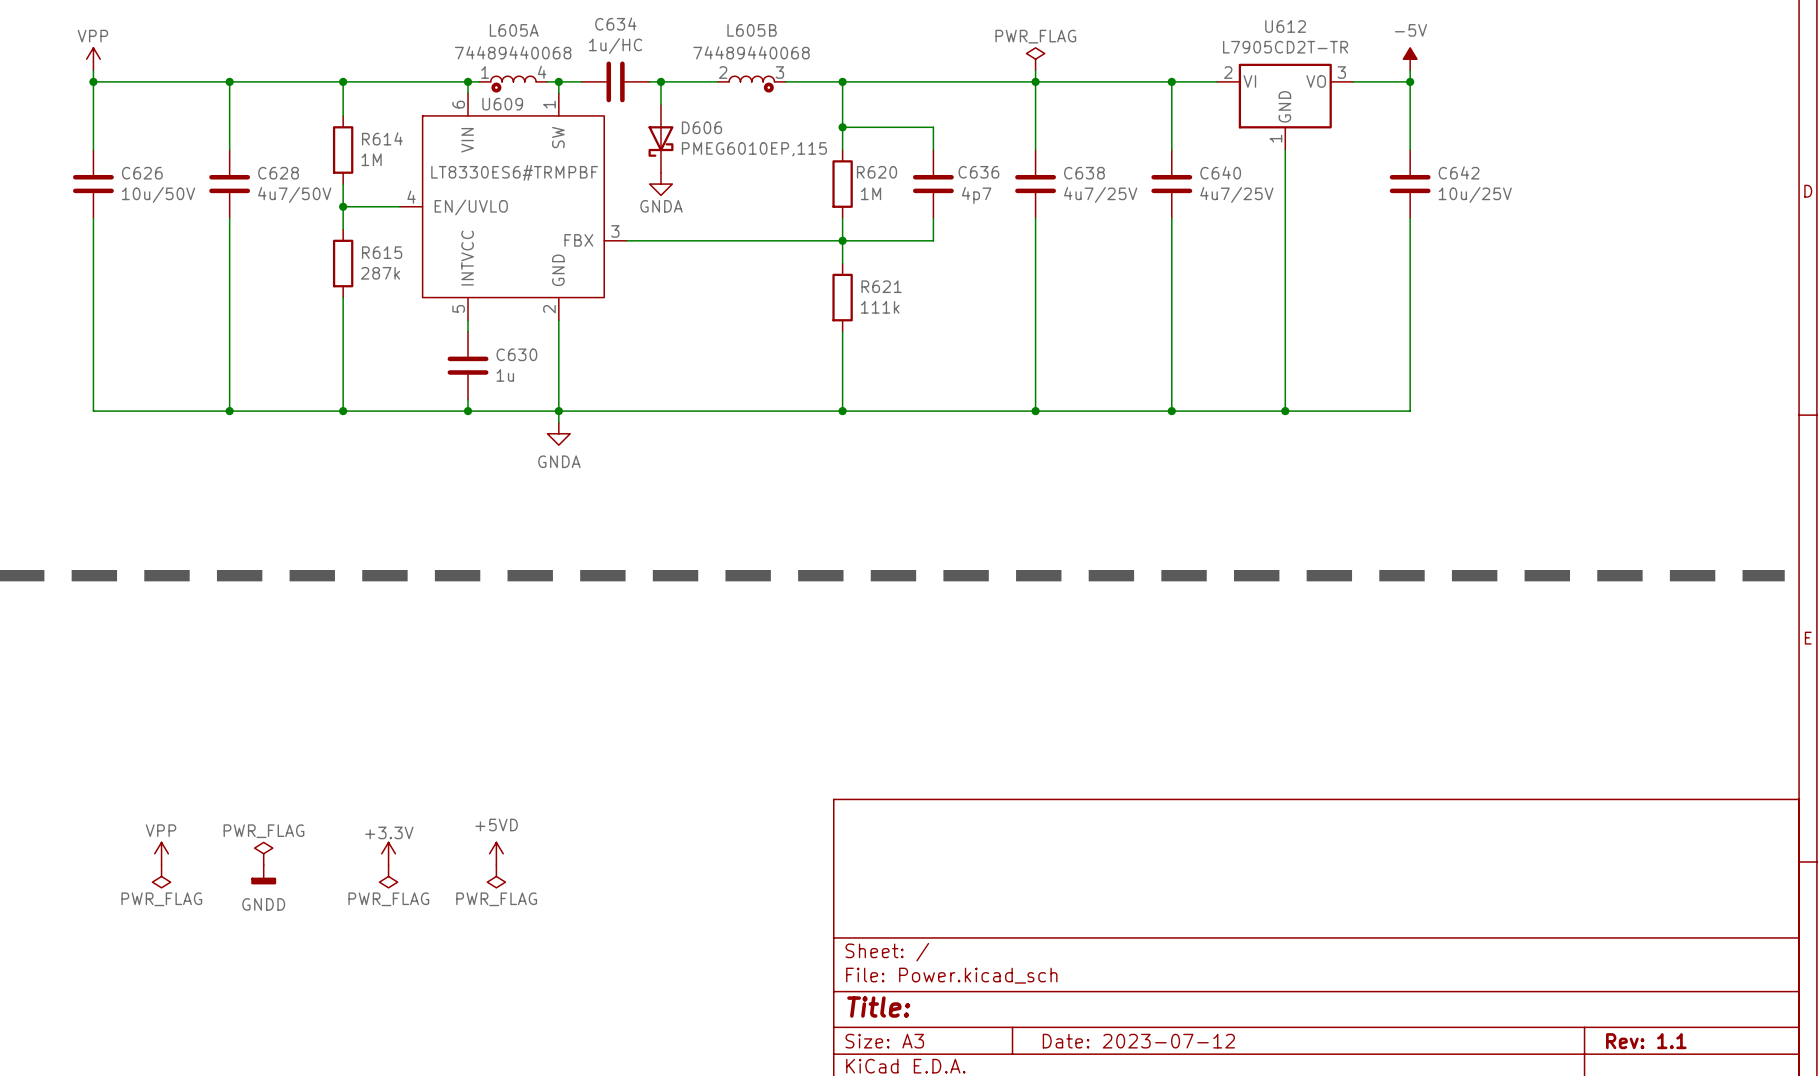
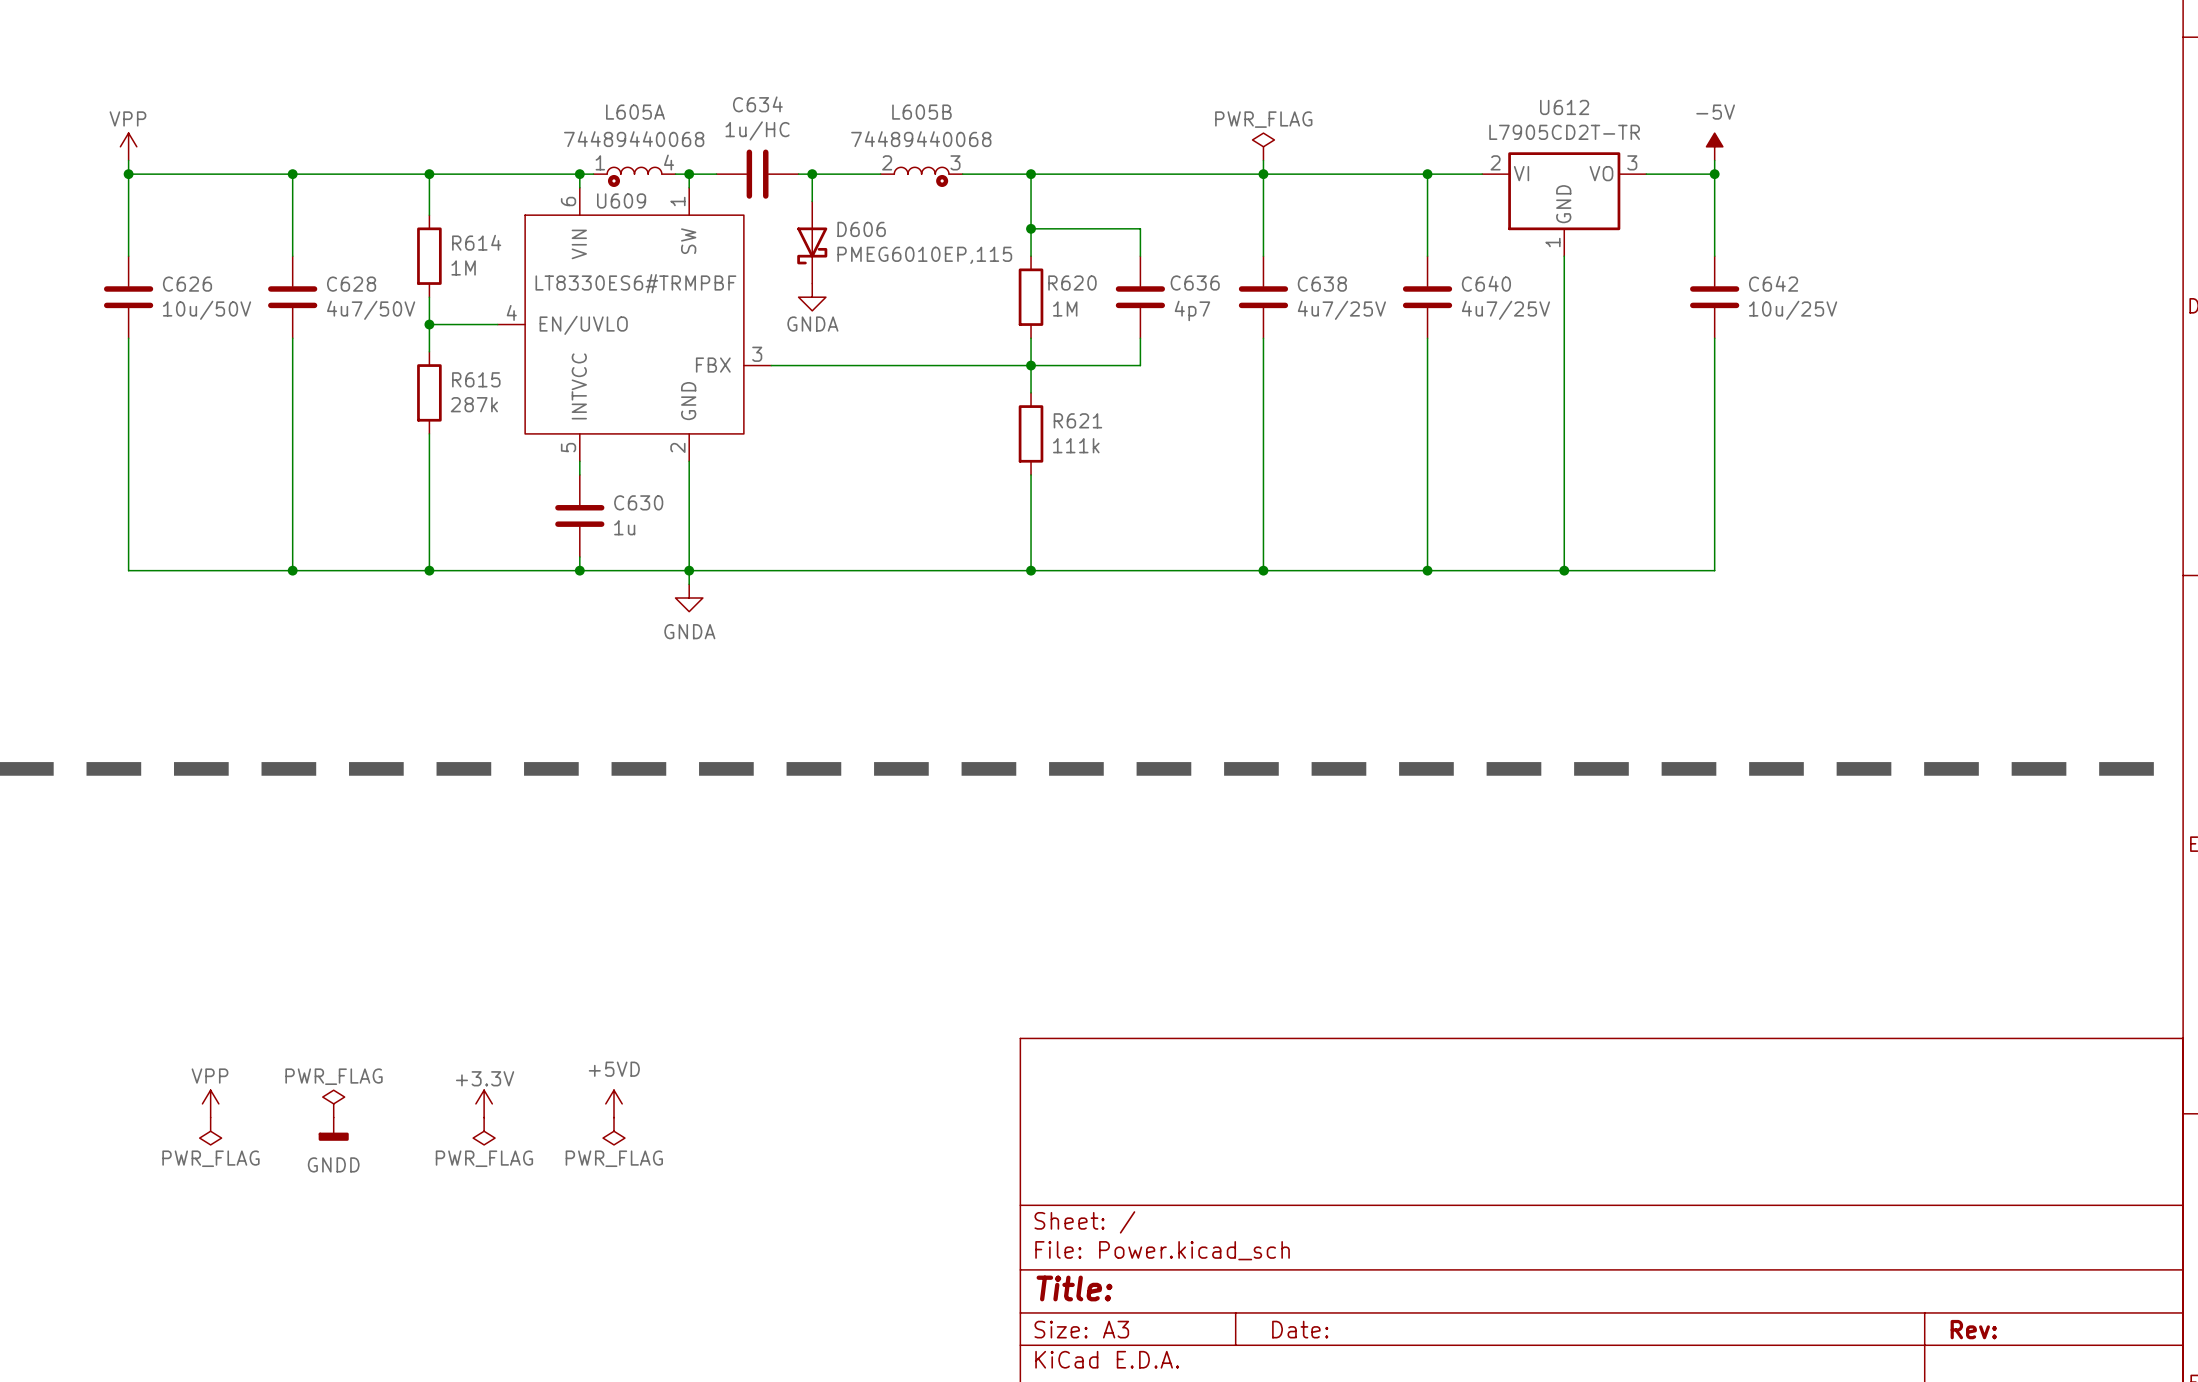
title block: Date: 2023-07-12 (1138, 1041) -> Date: (1300, 1329)
title block: Rev: 1.1 (1646, 1041) -> Rev: (1973, 1329)

